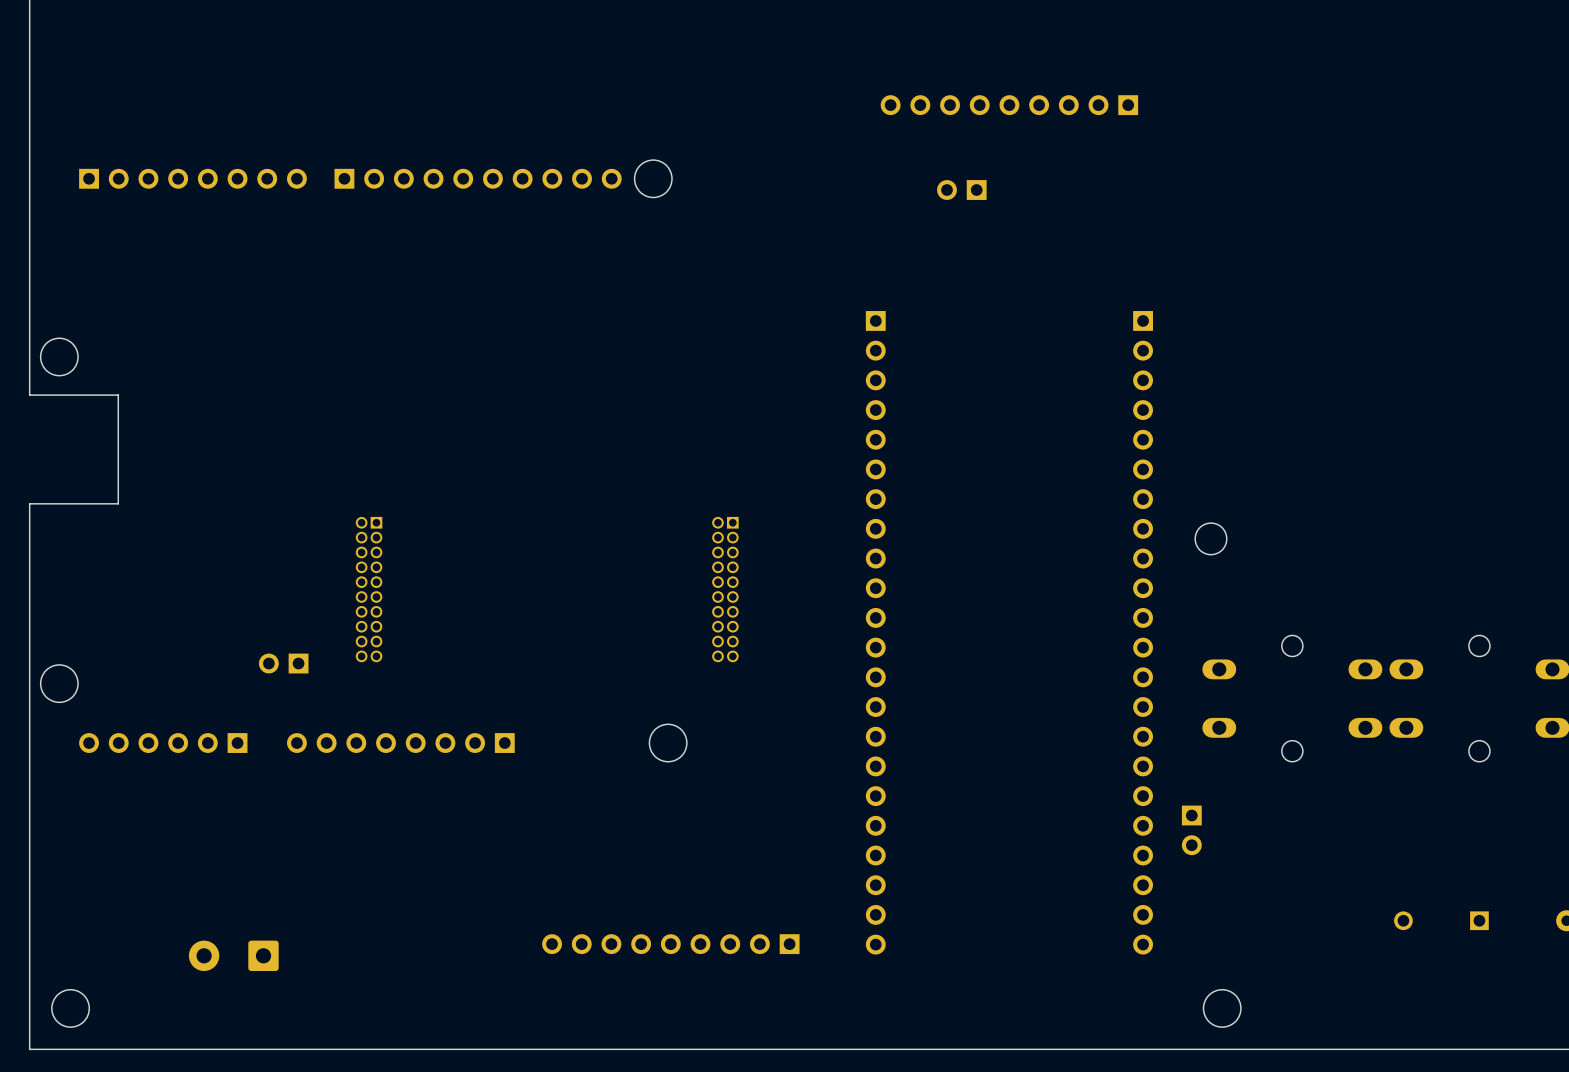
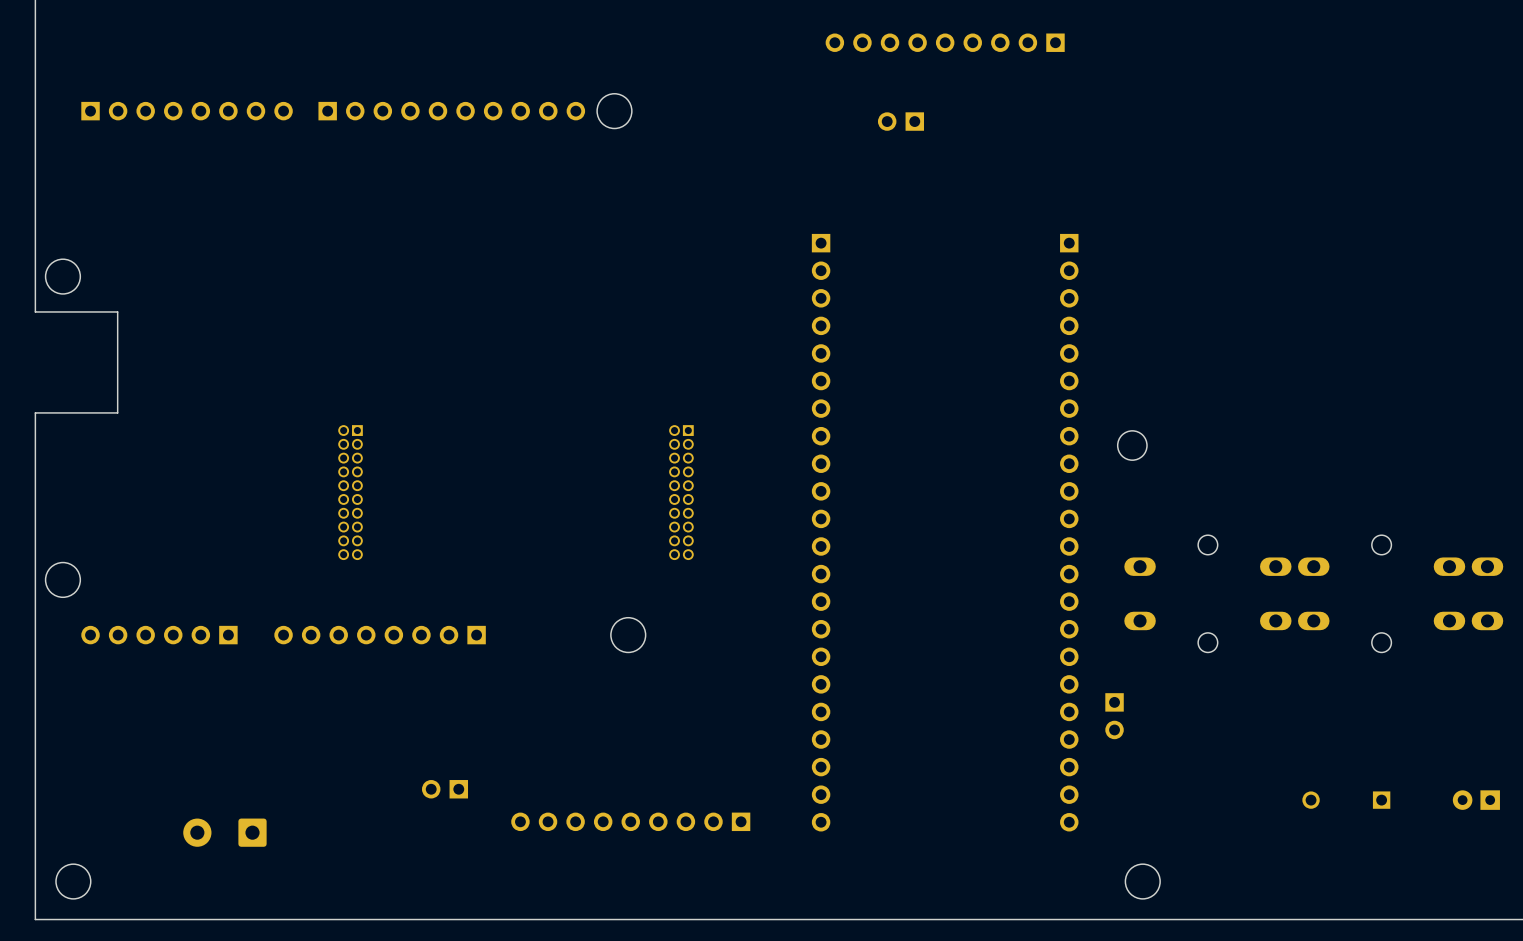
part: (283, 663) -> none
part: none -> (445, 789)

